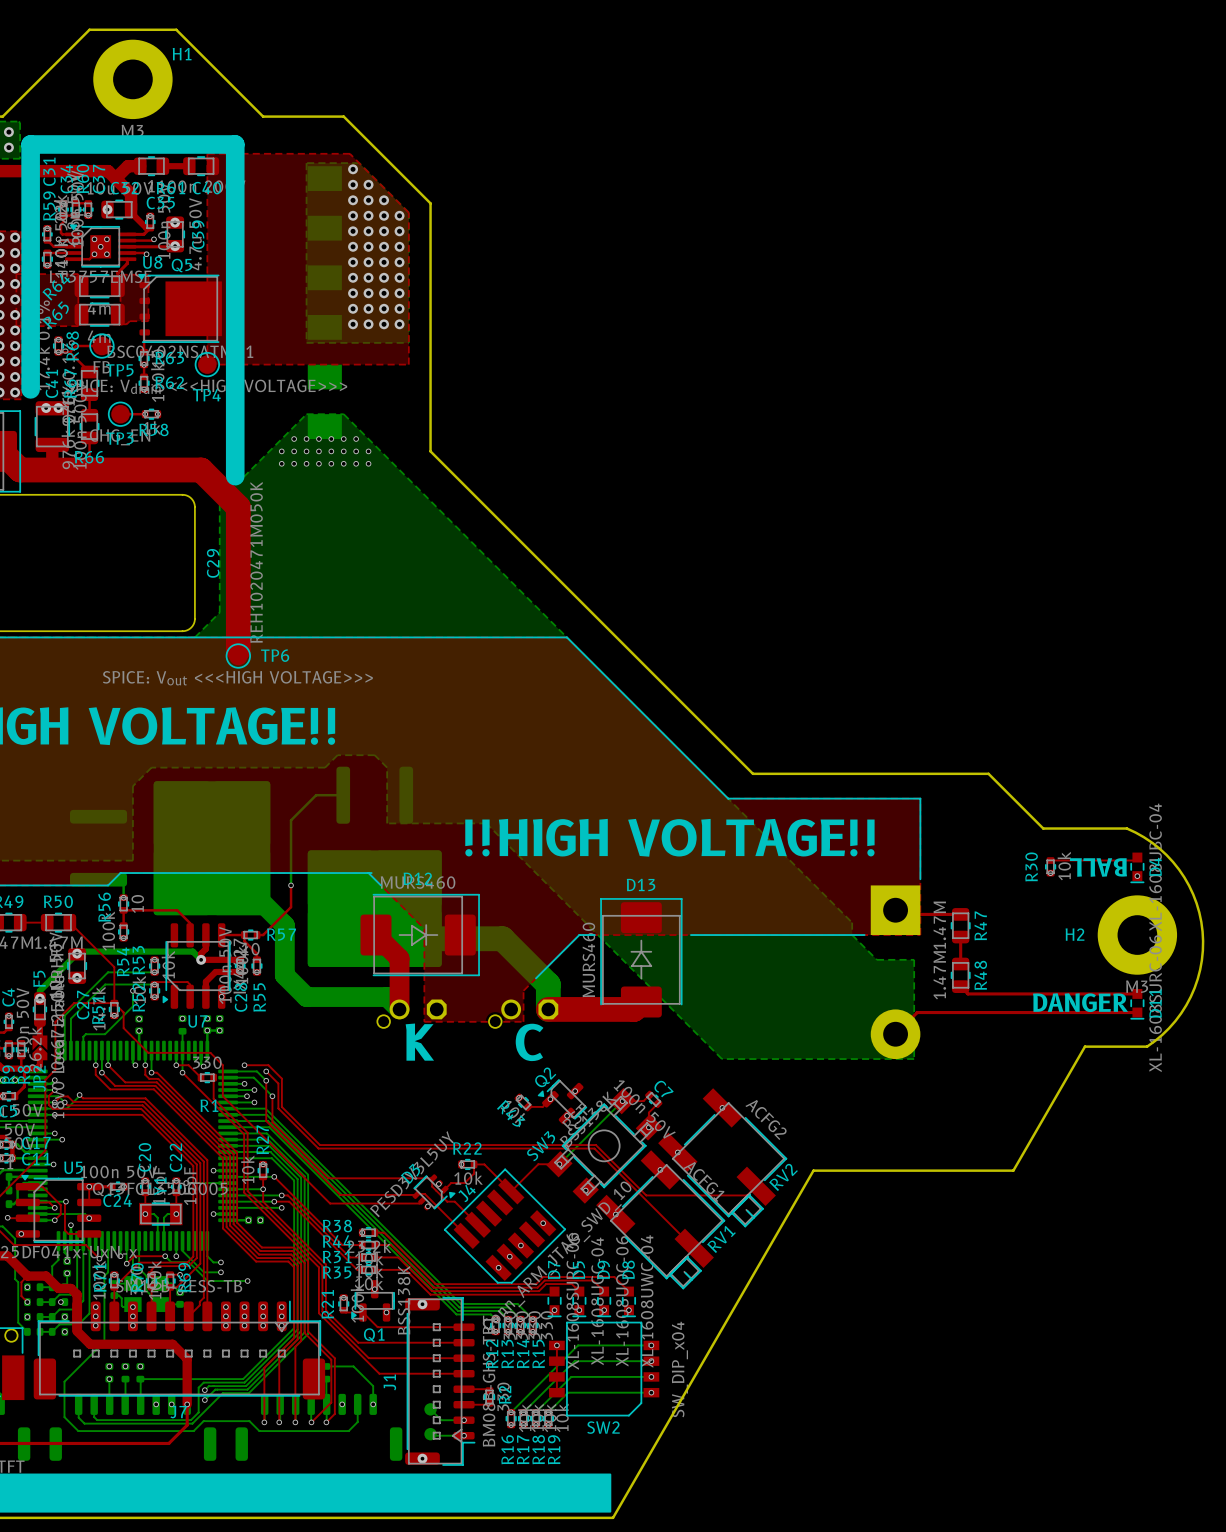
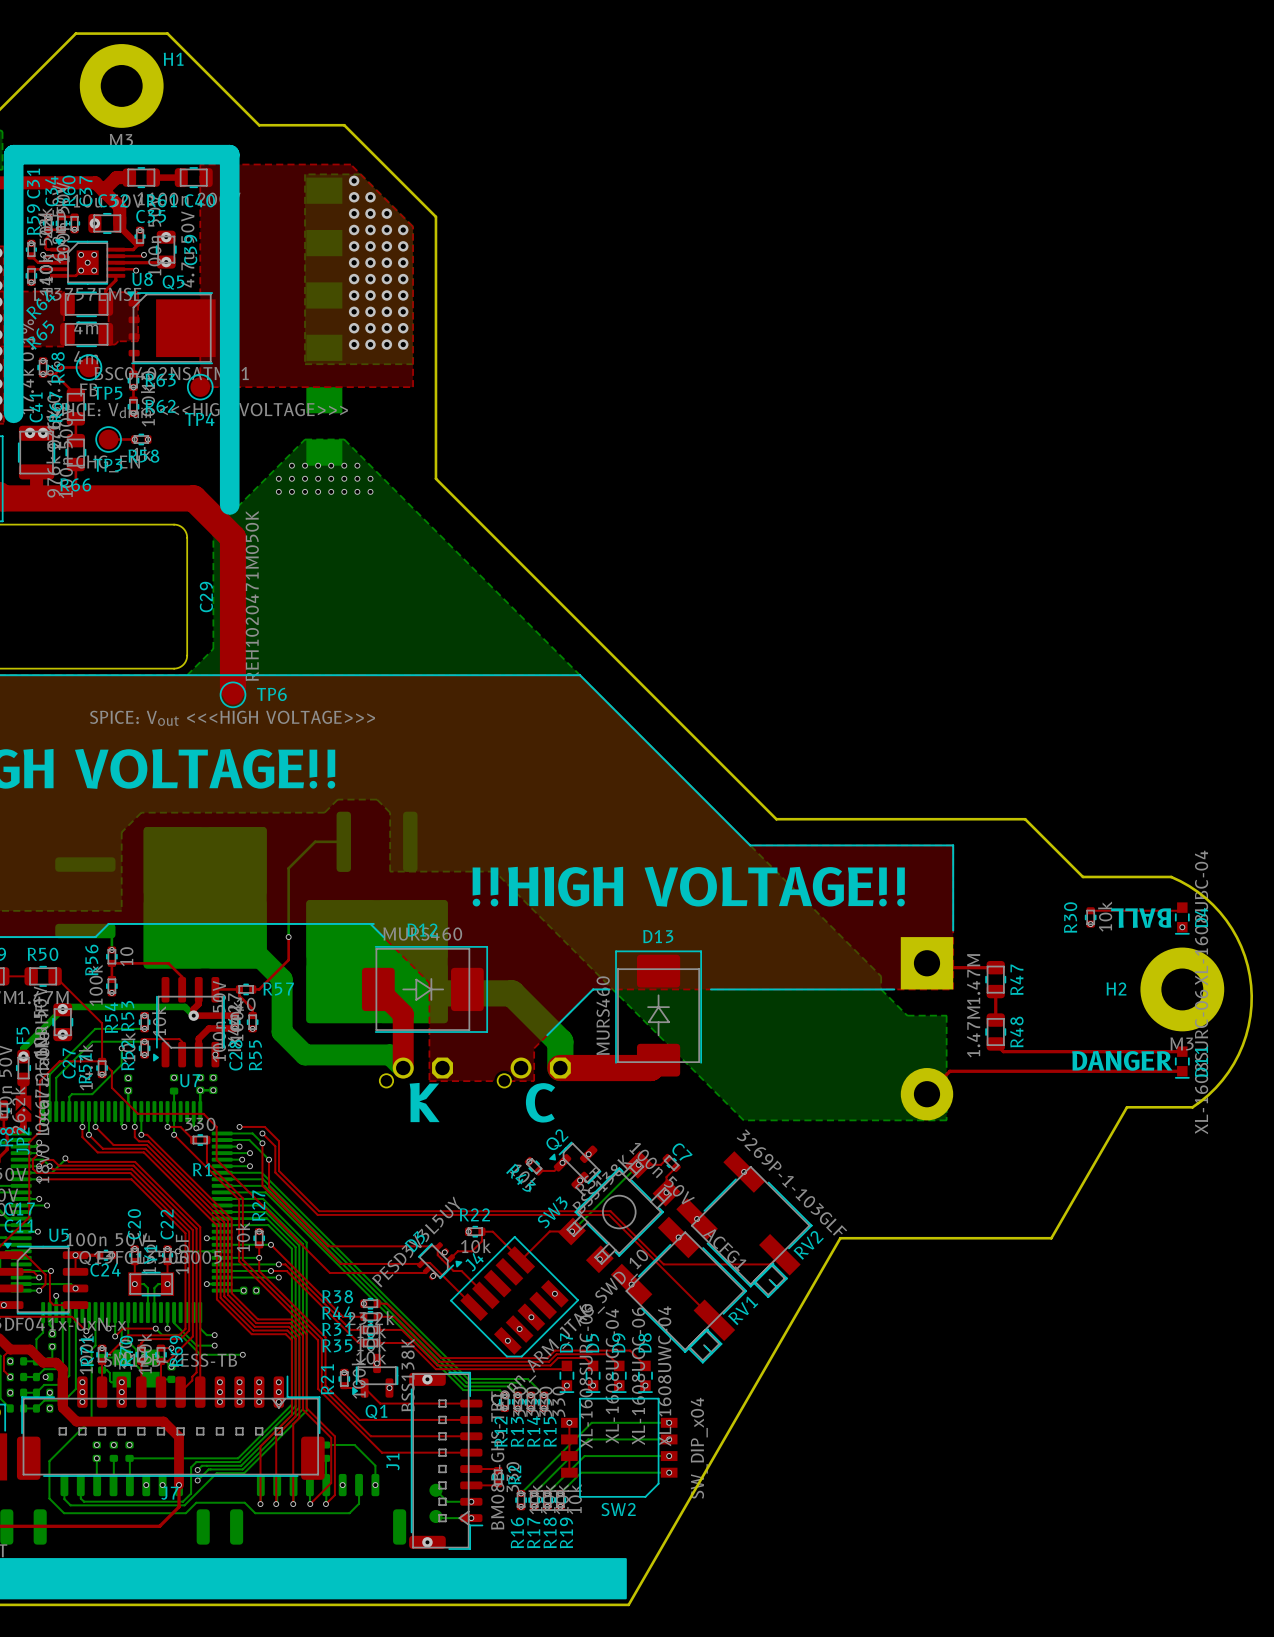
RV2 value: ACFG2 (766, 1119) -> 3269P-1-103GLF (791, 1182)

